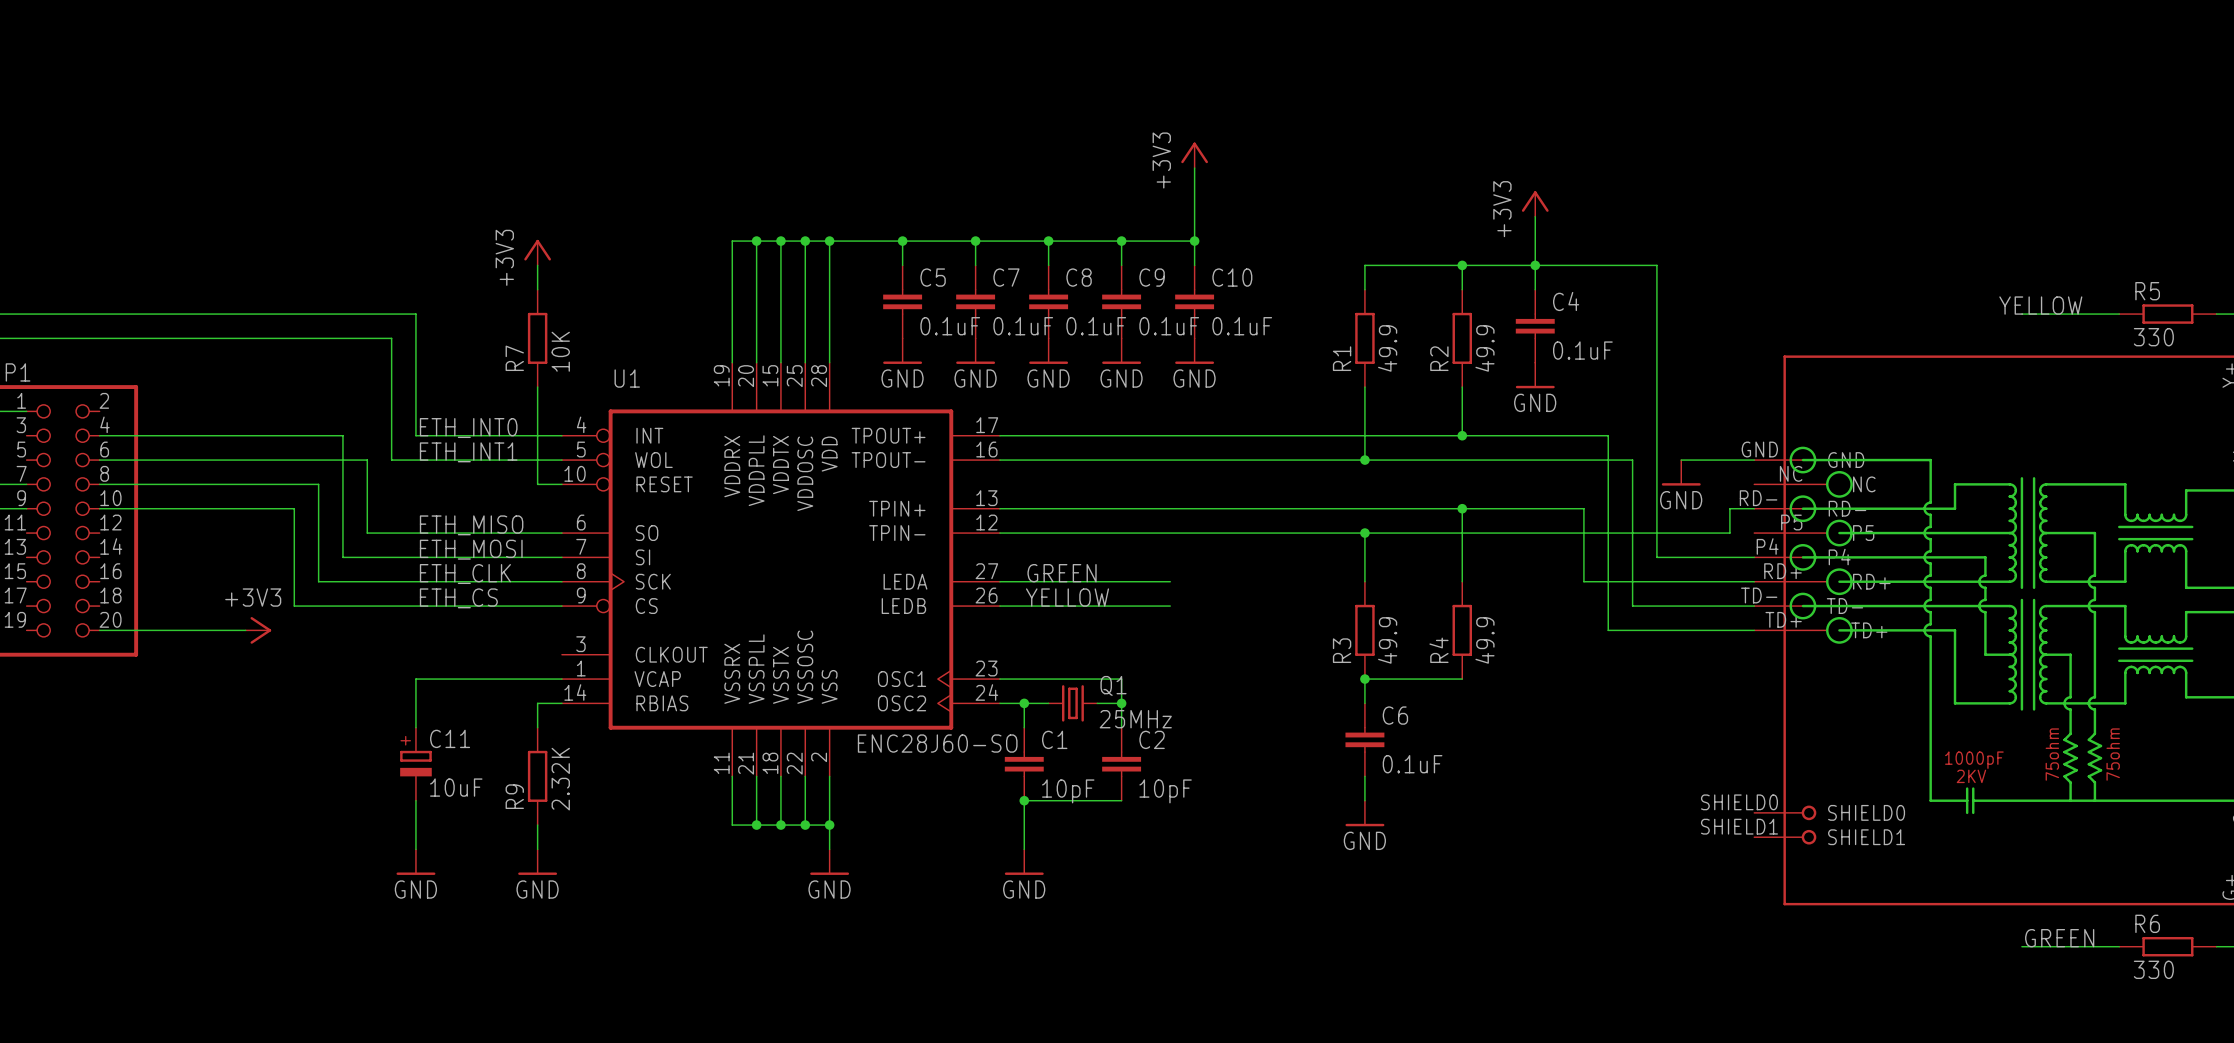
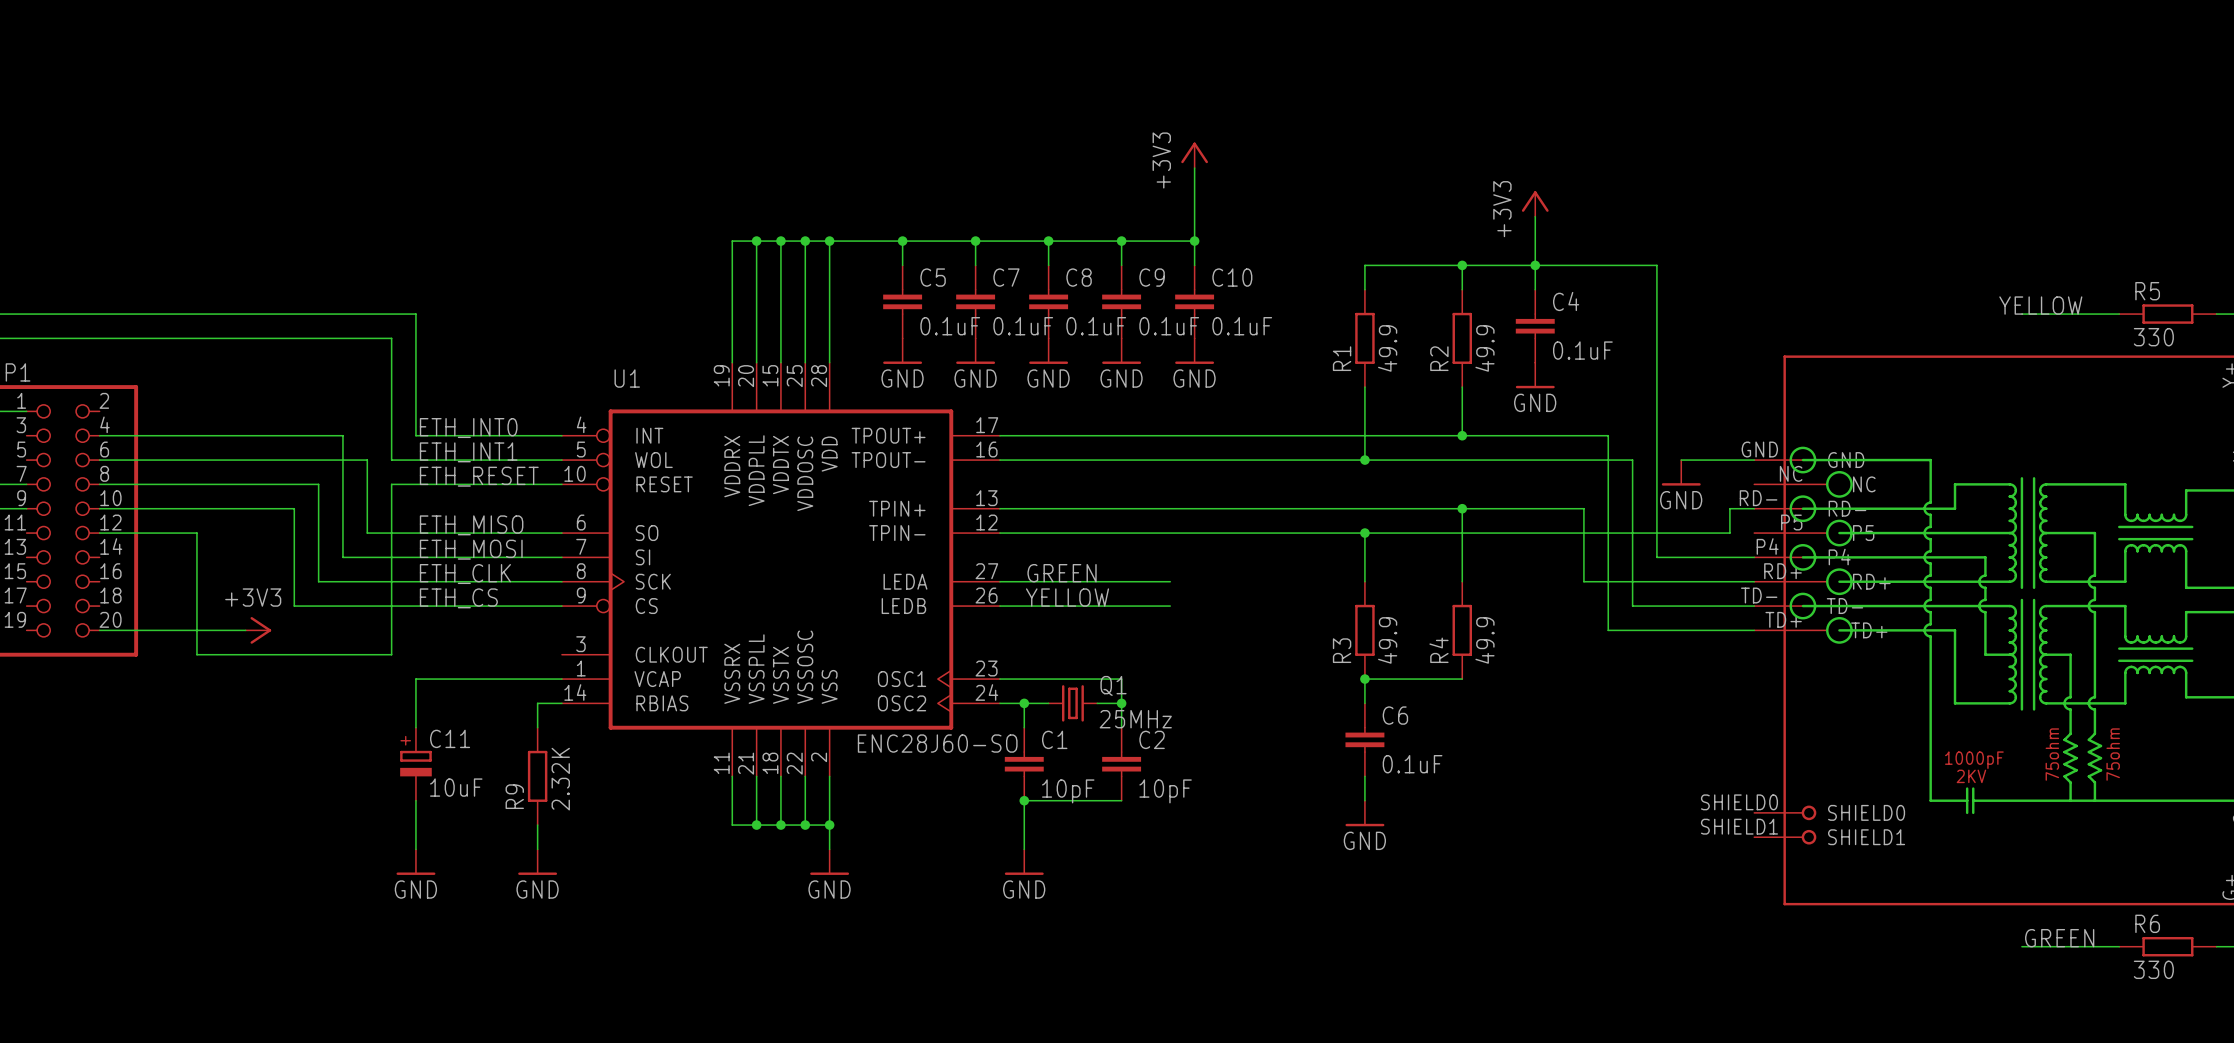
power symbol: +3V3 (537, 252) -> none
wire: (537, 265) (537, 289) -> none
R7: 10K (537, 338) -> none
wire: (537, 387) (537, 484) -> (99, 533) (196, 533) (196, 654) (391, 654) (391, 484) (537, 484)
label: none -> ETH_RESET (479, 476)

